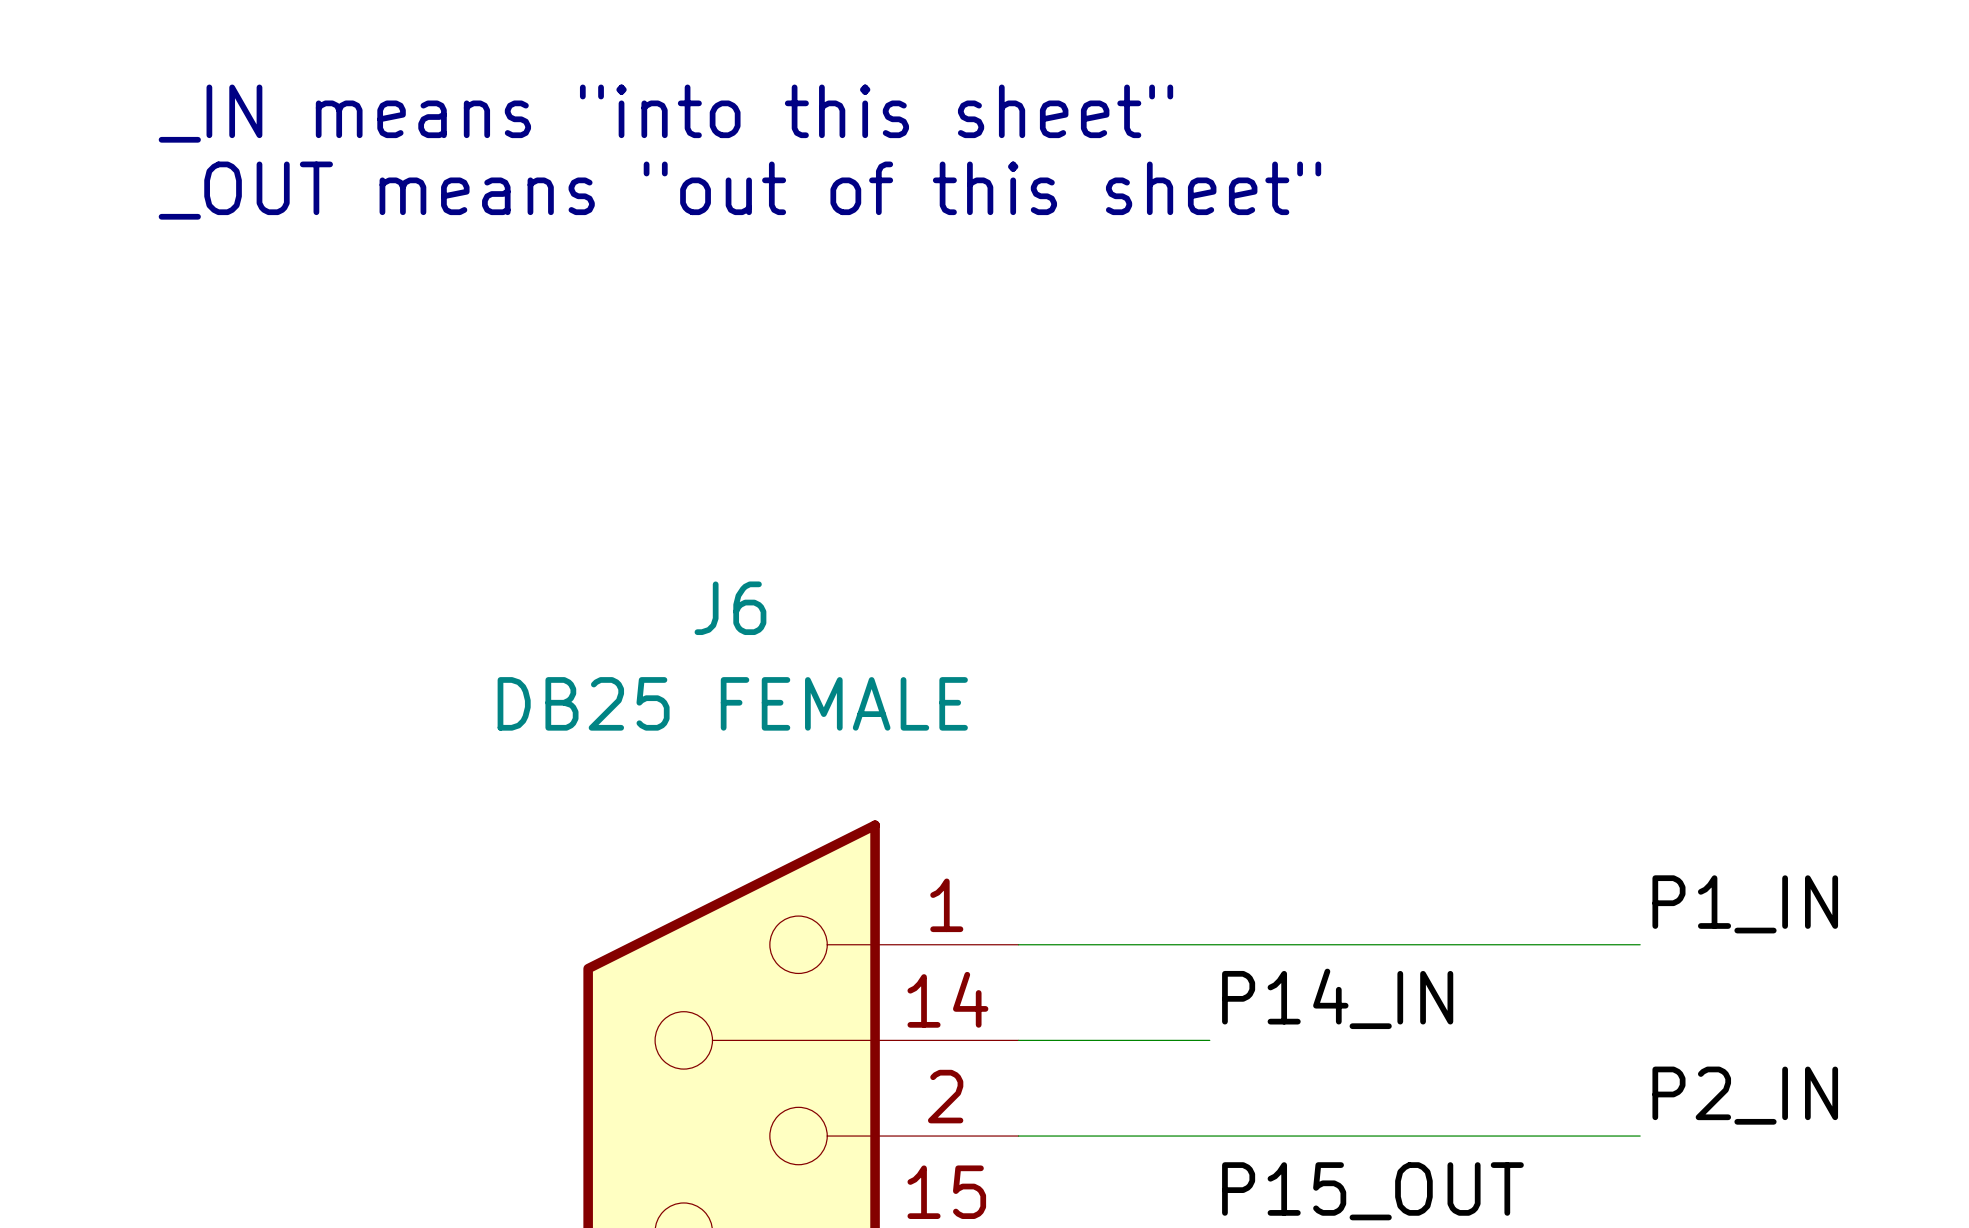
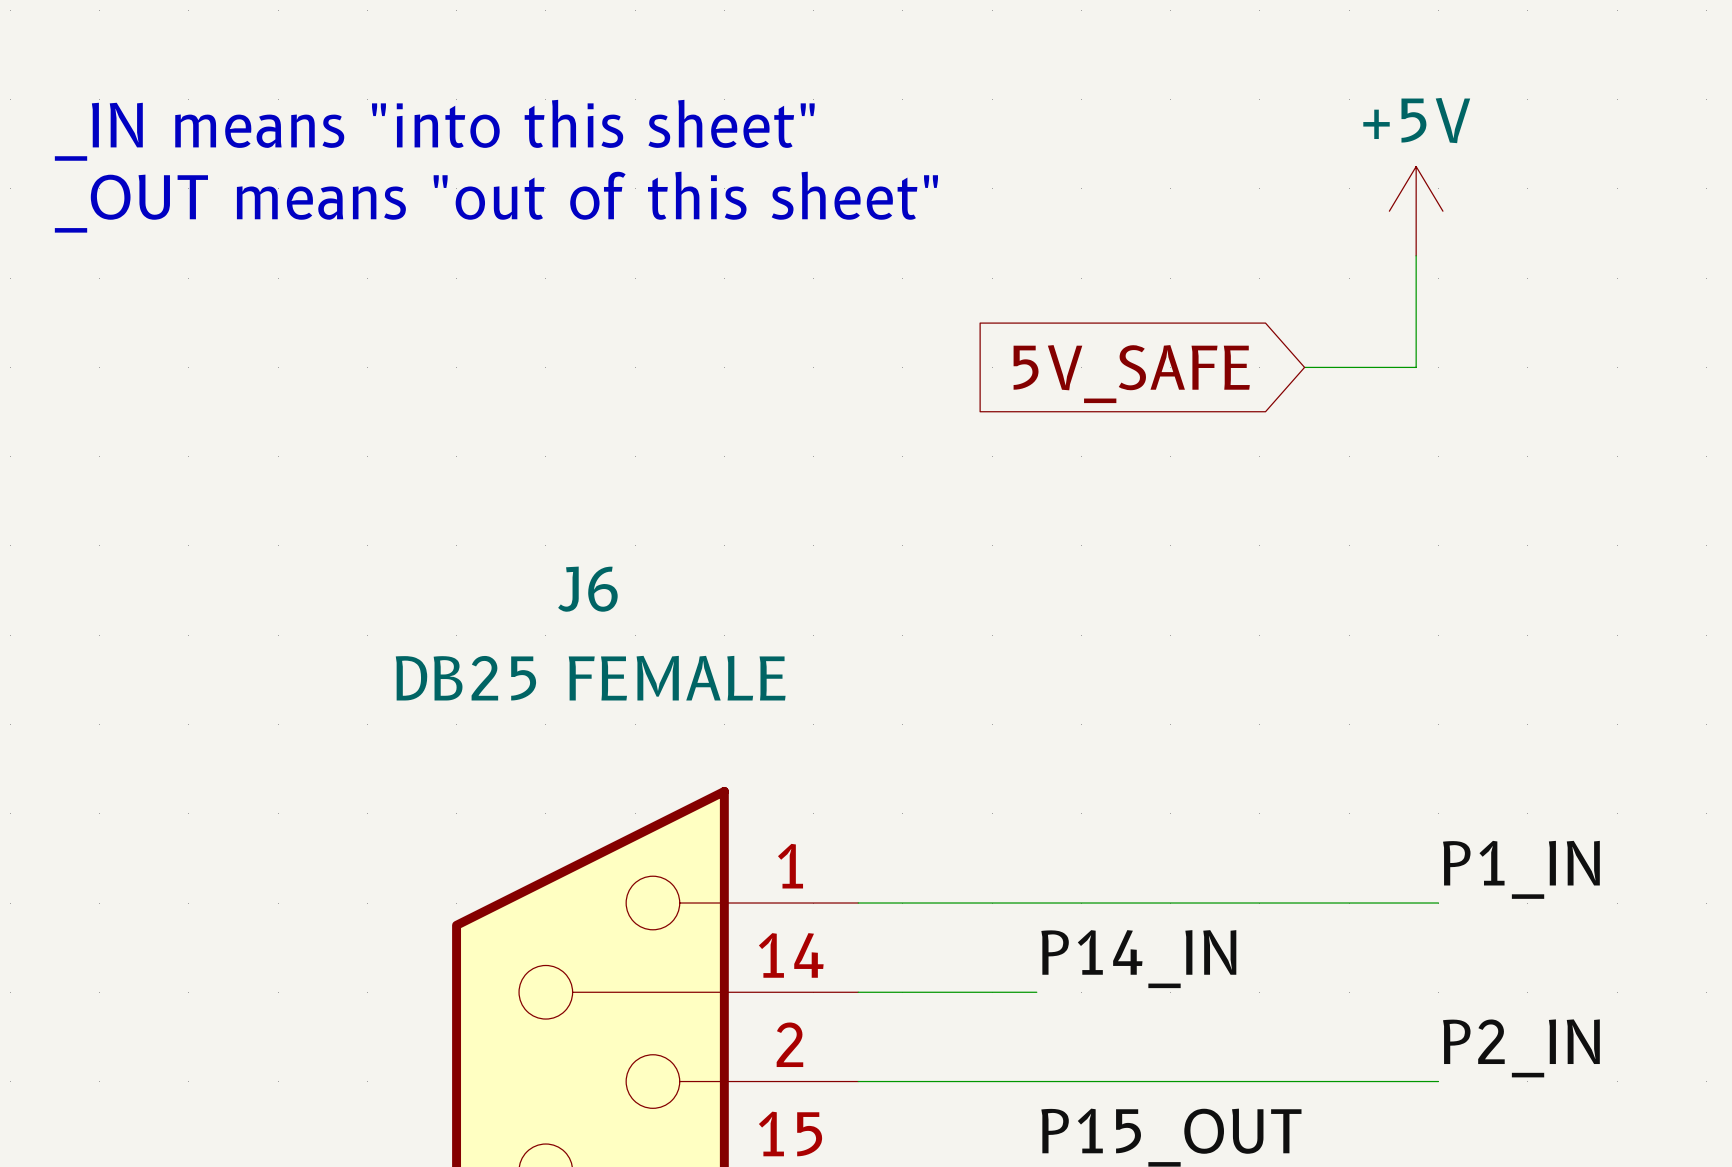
power symbol: none -> +5V (1416, 211)
wire: none -> (1416, 255) (1416, 367) (1304, 367)
global label: none -> 5V_SAFE (1131, 374)

